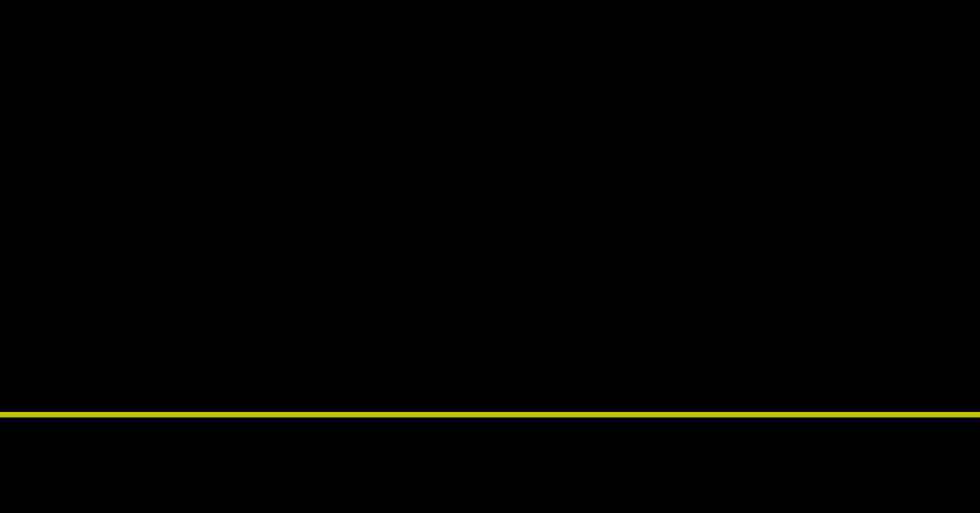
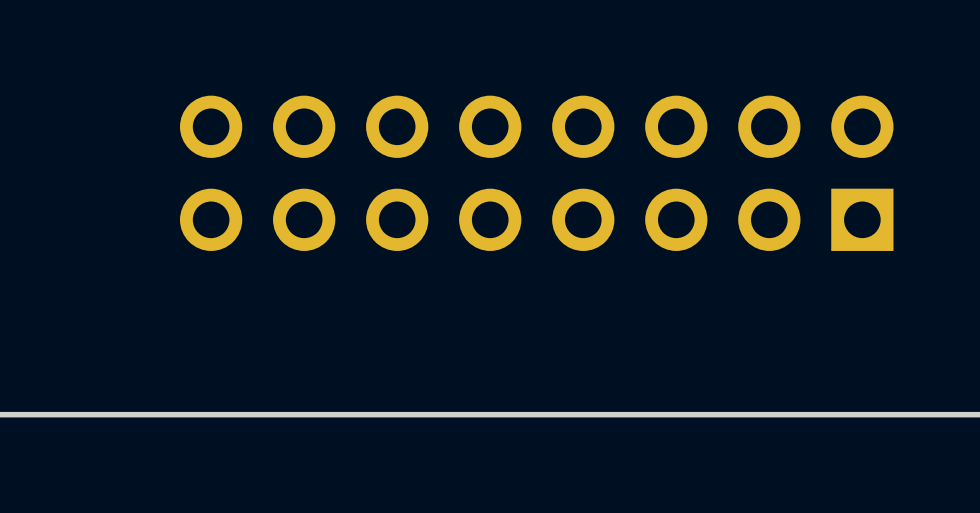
part: none -> (536, 173)

